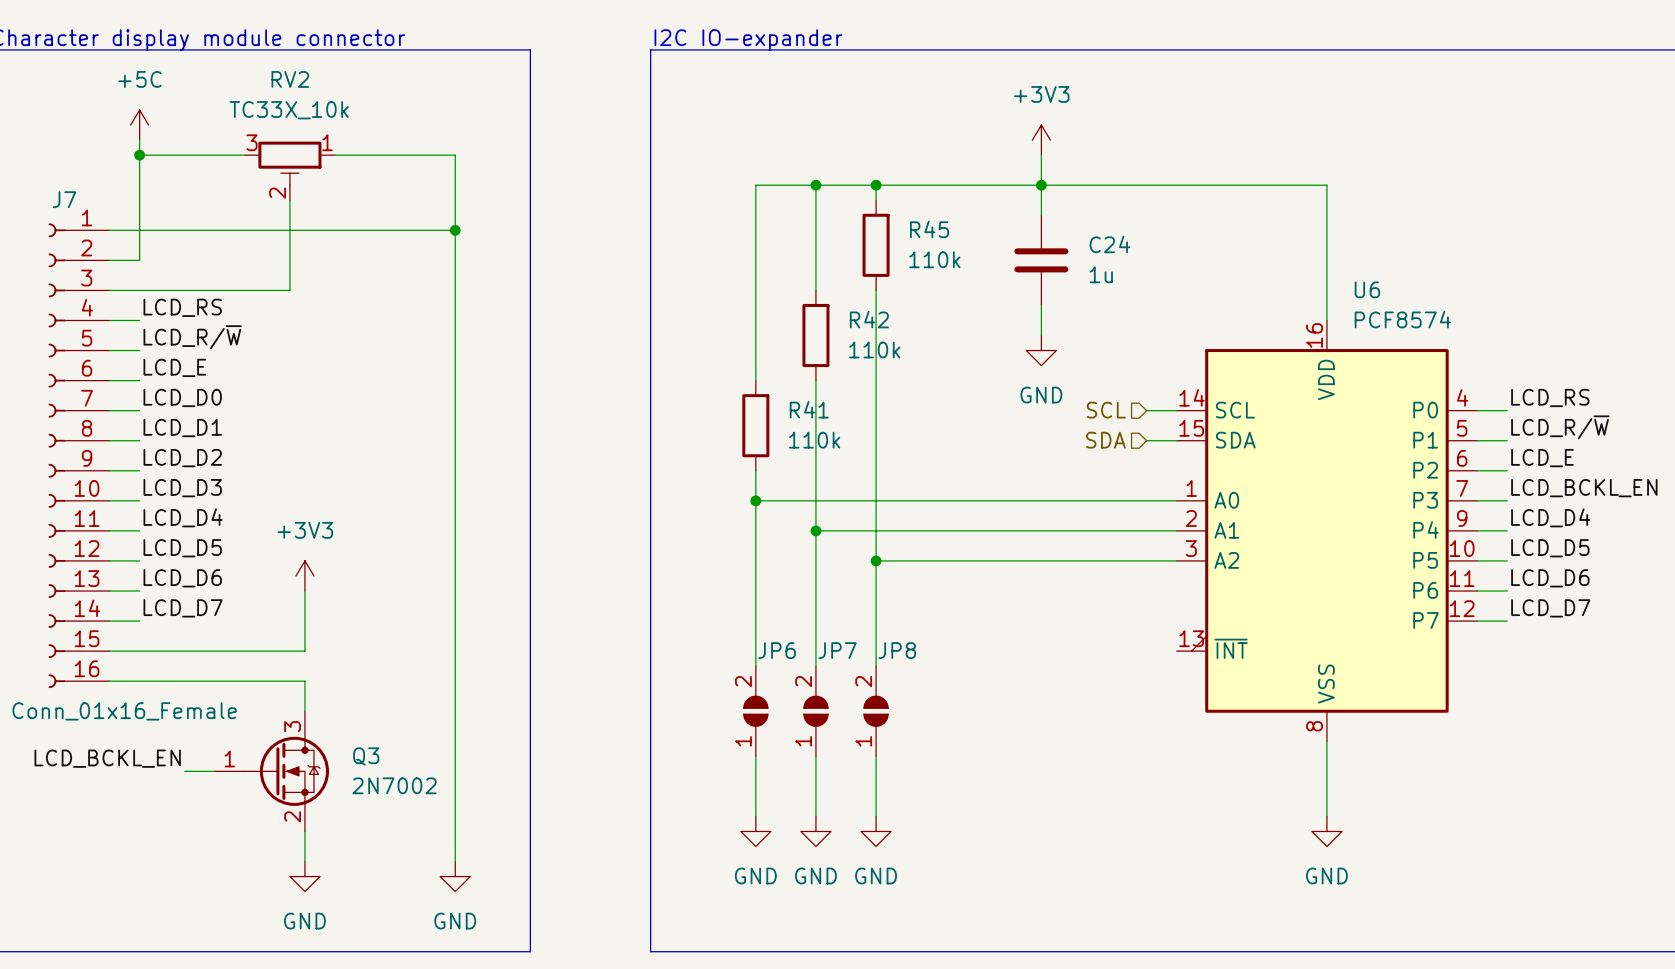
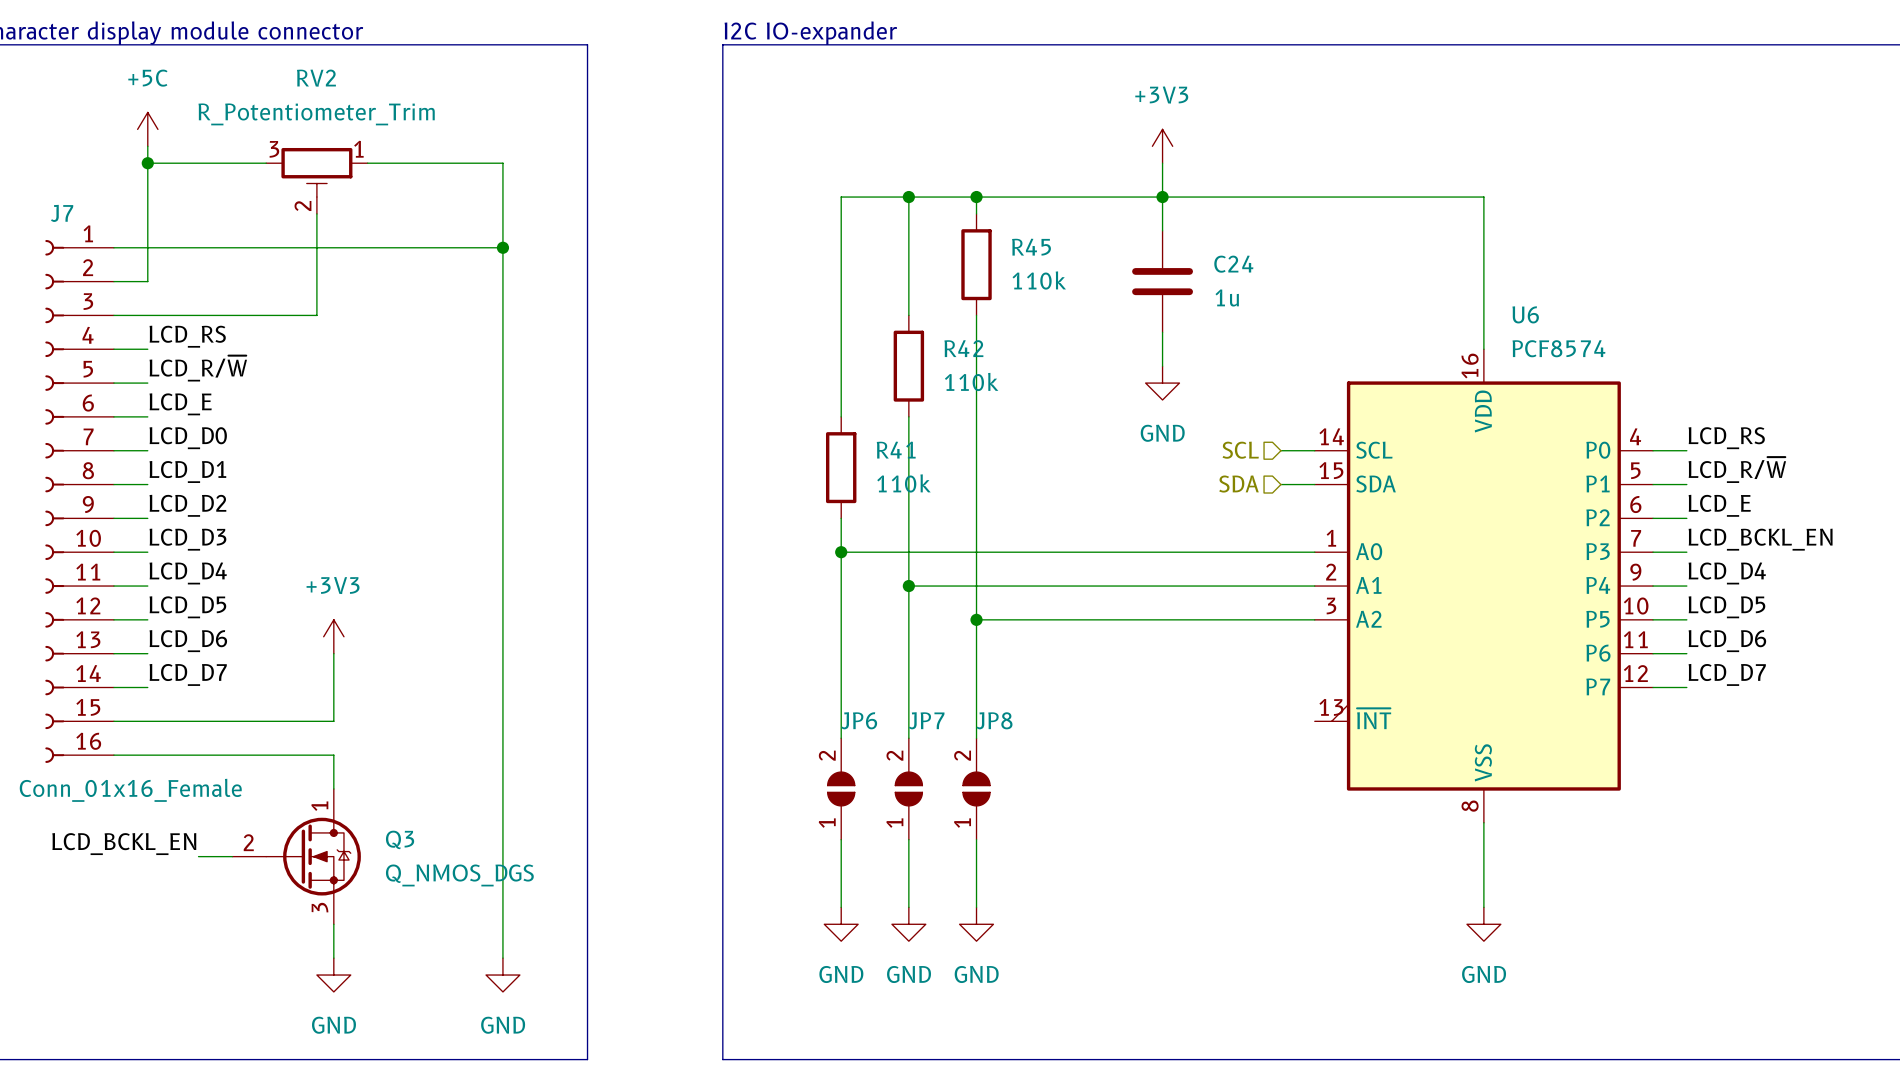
RV2 value: TC33X_10k (289, 110) -> R_Potentiometer_Trim (316, 114)
Q3 pin number: 3 (292, 726) -> 1 (319, 806)
Q3 pin number: 1 (229, 758) -> 2 (248, 842)
Q3 value: 2N7002 (394, 785) -> Q_NMOS_DGS (459, 875)
Q3 pin number: 2 (292, 816) -> 3 (319, 907)

